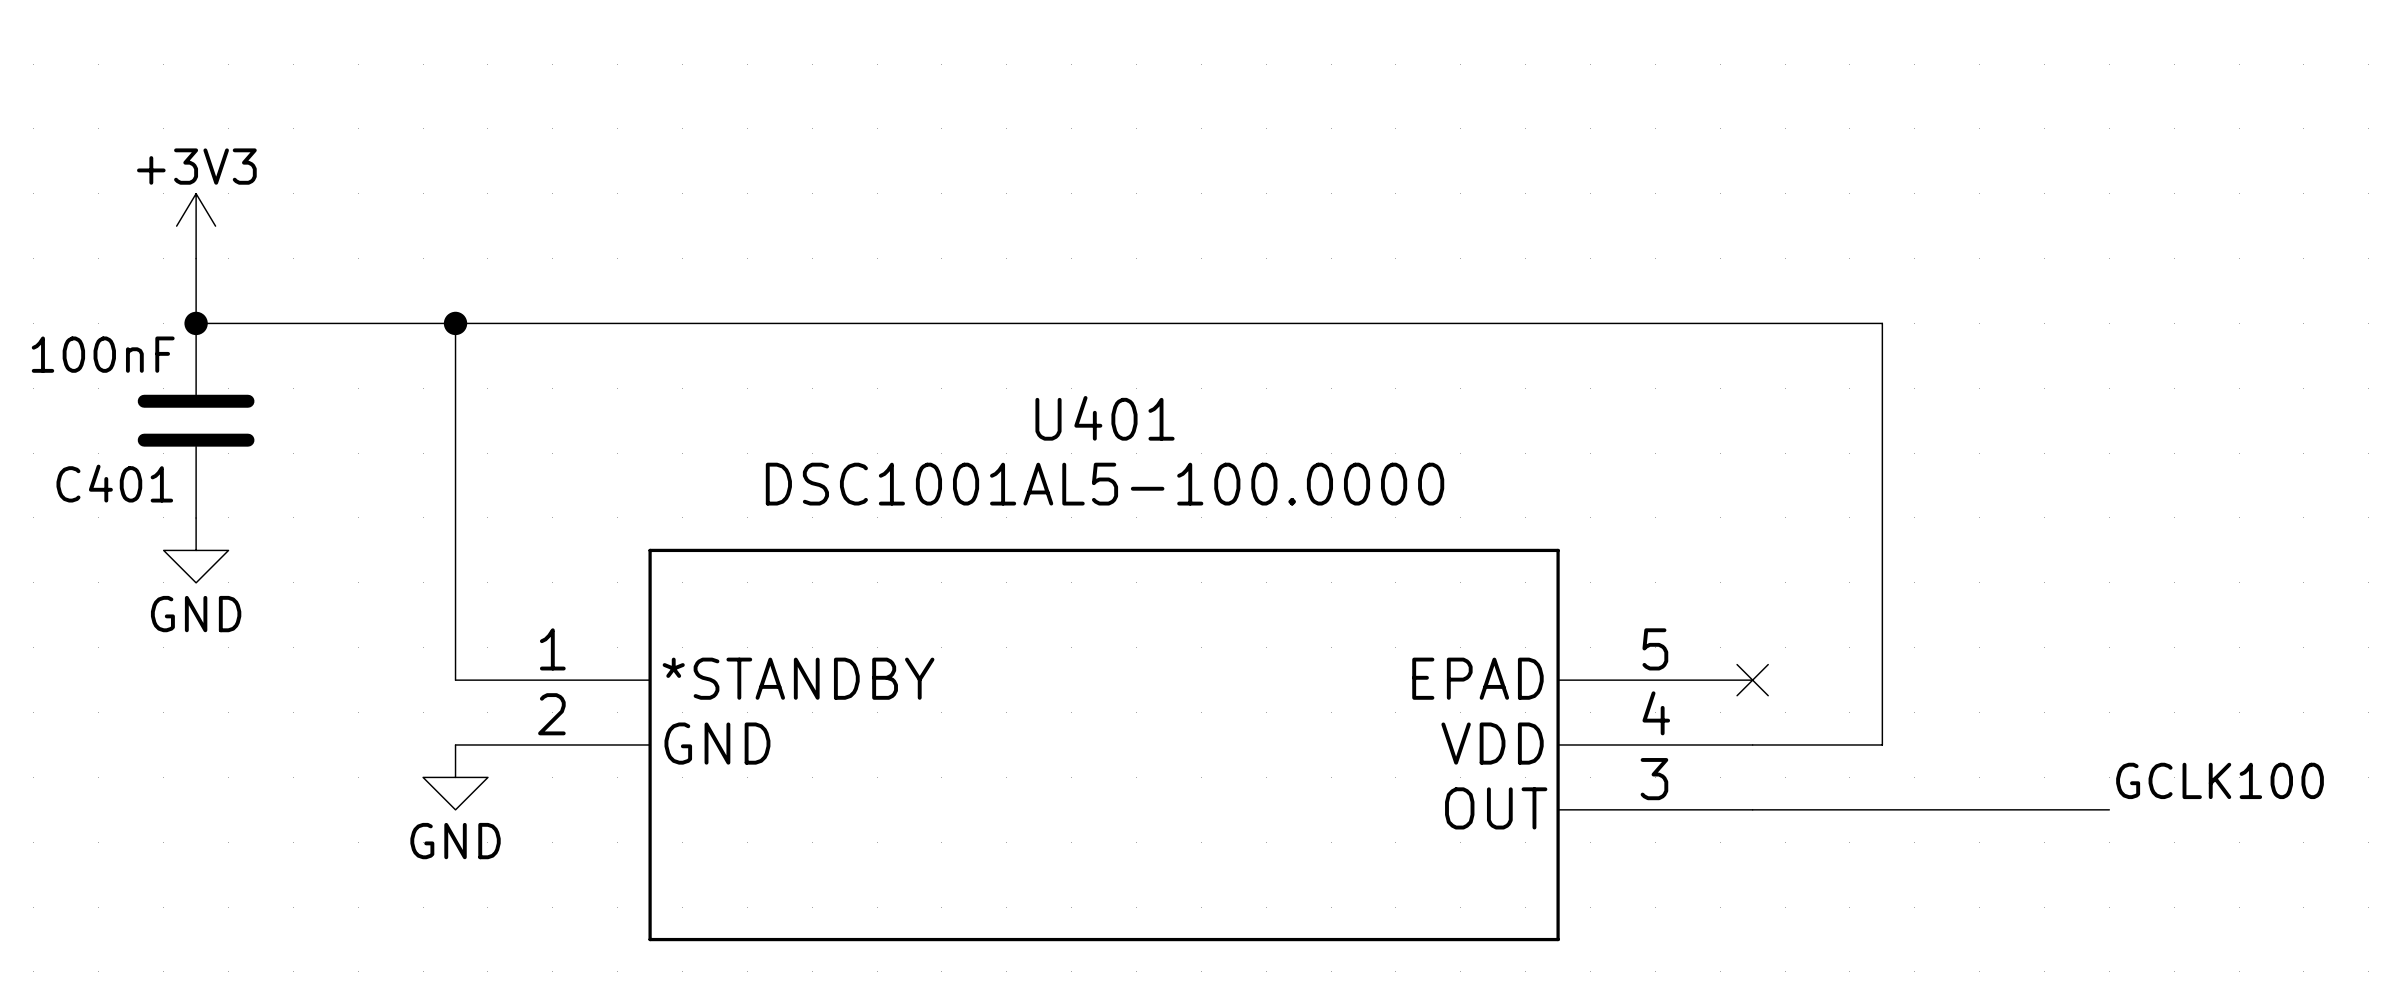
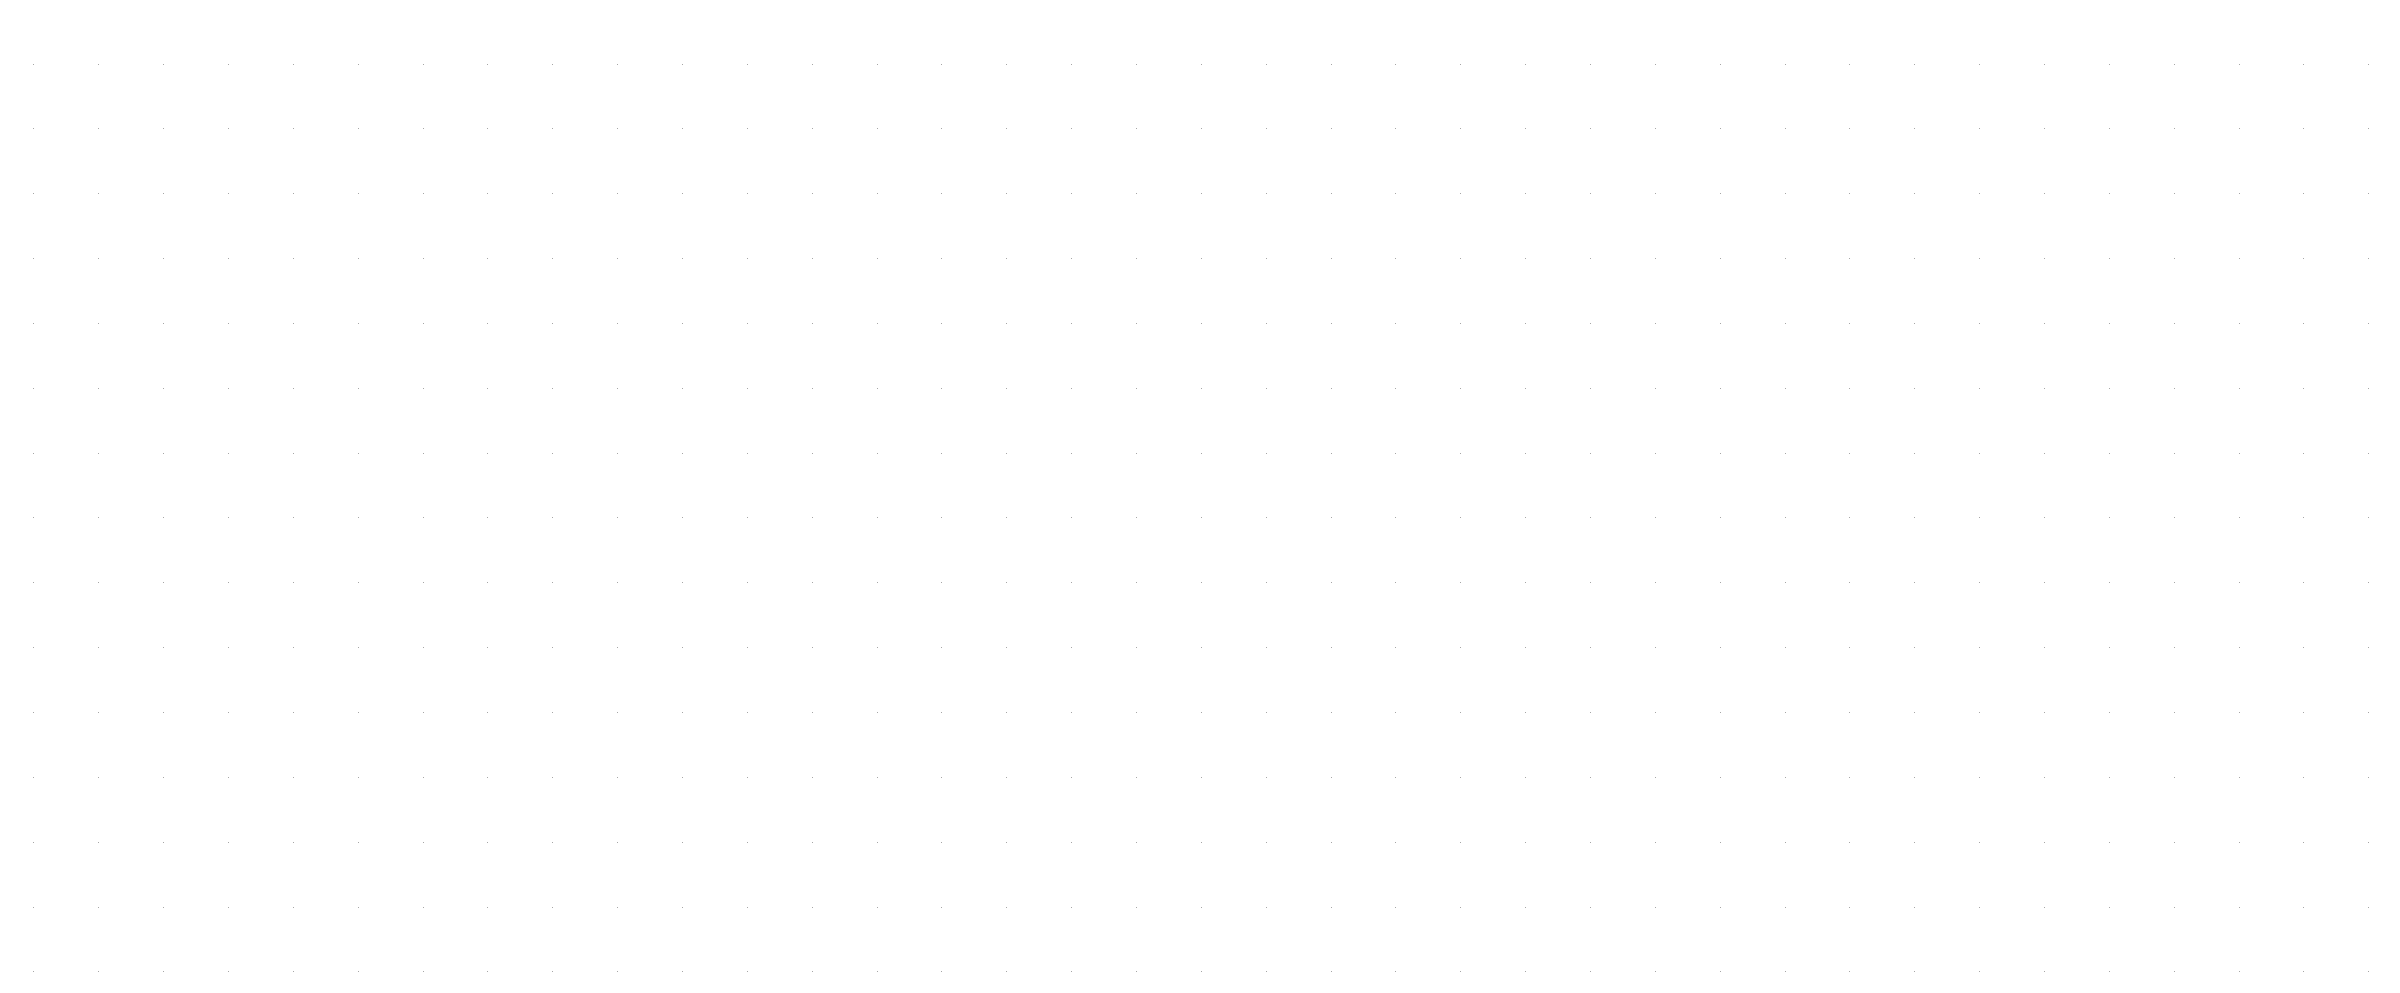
power symbol: +3V3 (196, 226) -> none
wire: (196, 258) (196, 323) (1882, 323) (1882, 744) (1752, 744) -> none
junction: (196, 323) -> none
wire: (455, 323) (455, 680) -> none
junction: (455, 323) -> none
C401: 100nF (196, 420) -> none
power symbol: GND (196, 550) -> none
no-connect mark: (1752, 680) -> none
U401: DSC1001AL5-100.0000 (1104, 744) -> none
power symbol: GND (455, 777) -> none
label: GCLK100 (2220, 780) -> none
wire: (1752, 809) (2109, 809) -> none

